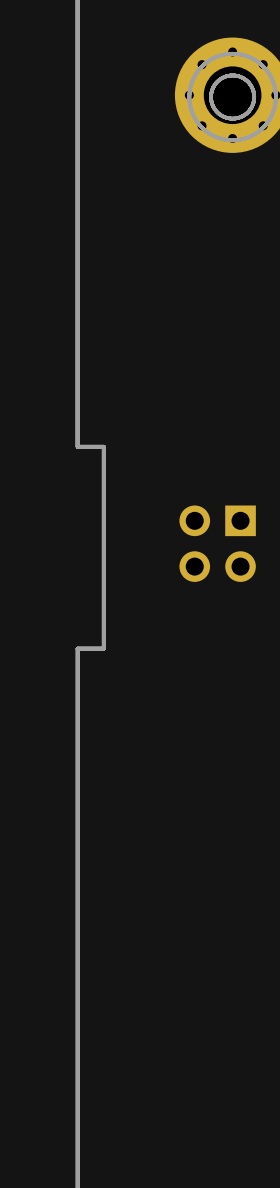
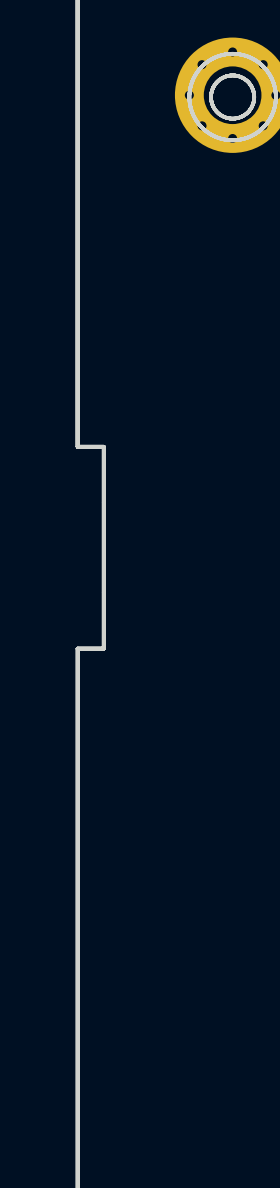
part: (217, 543) -> none

